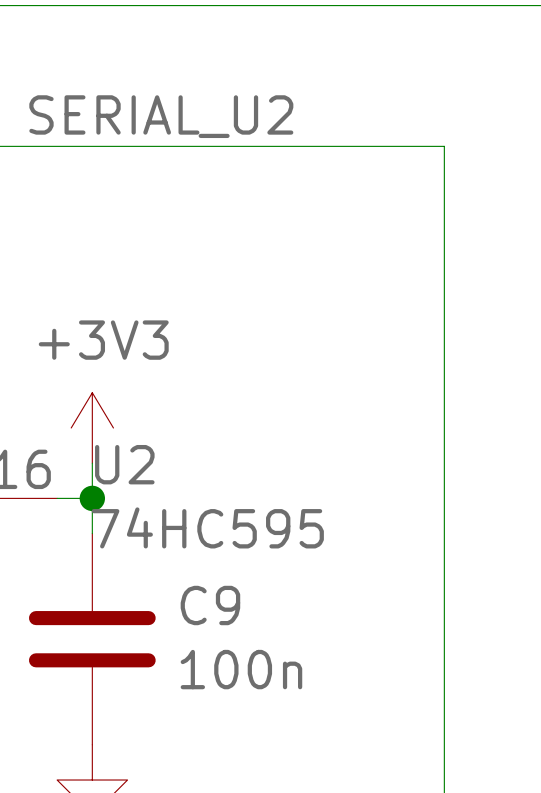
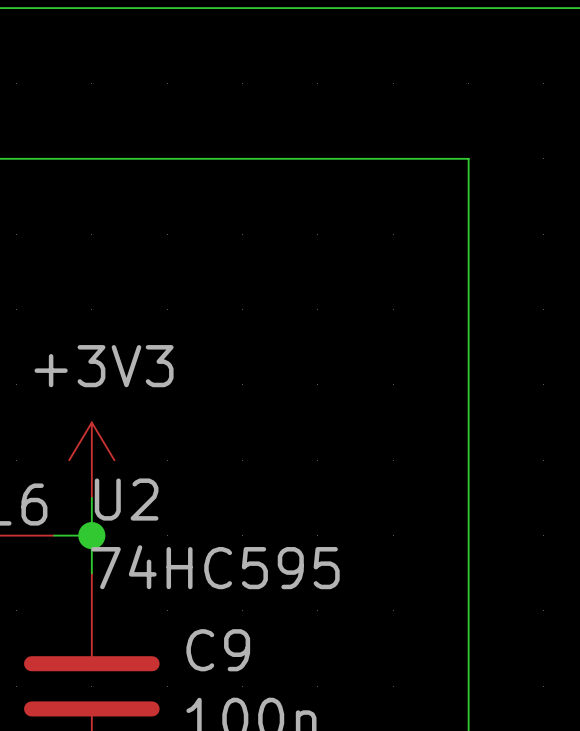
label: SERIAL_U2 (161, 116) -> none

